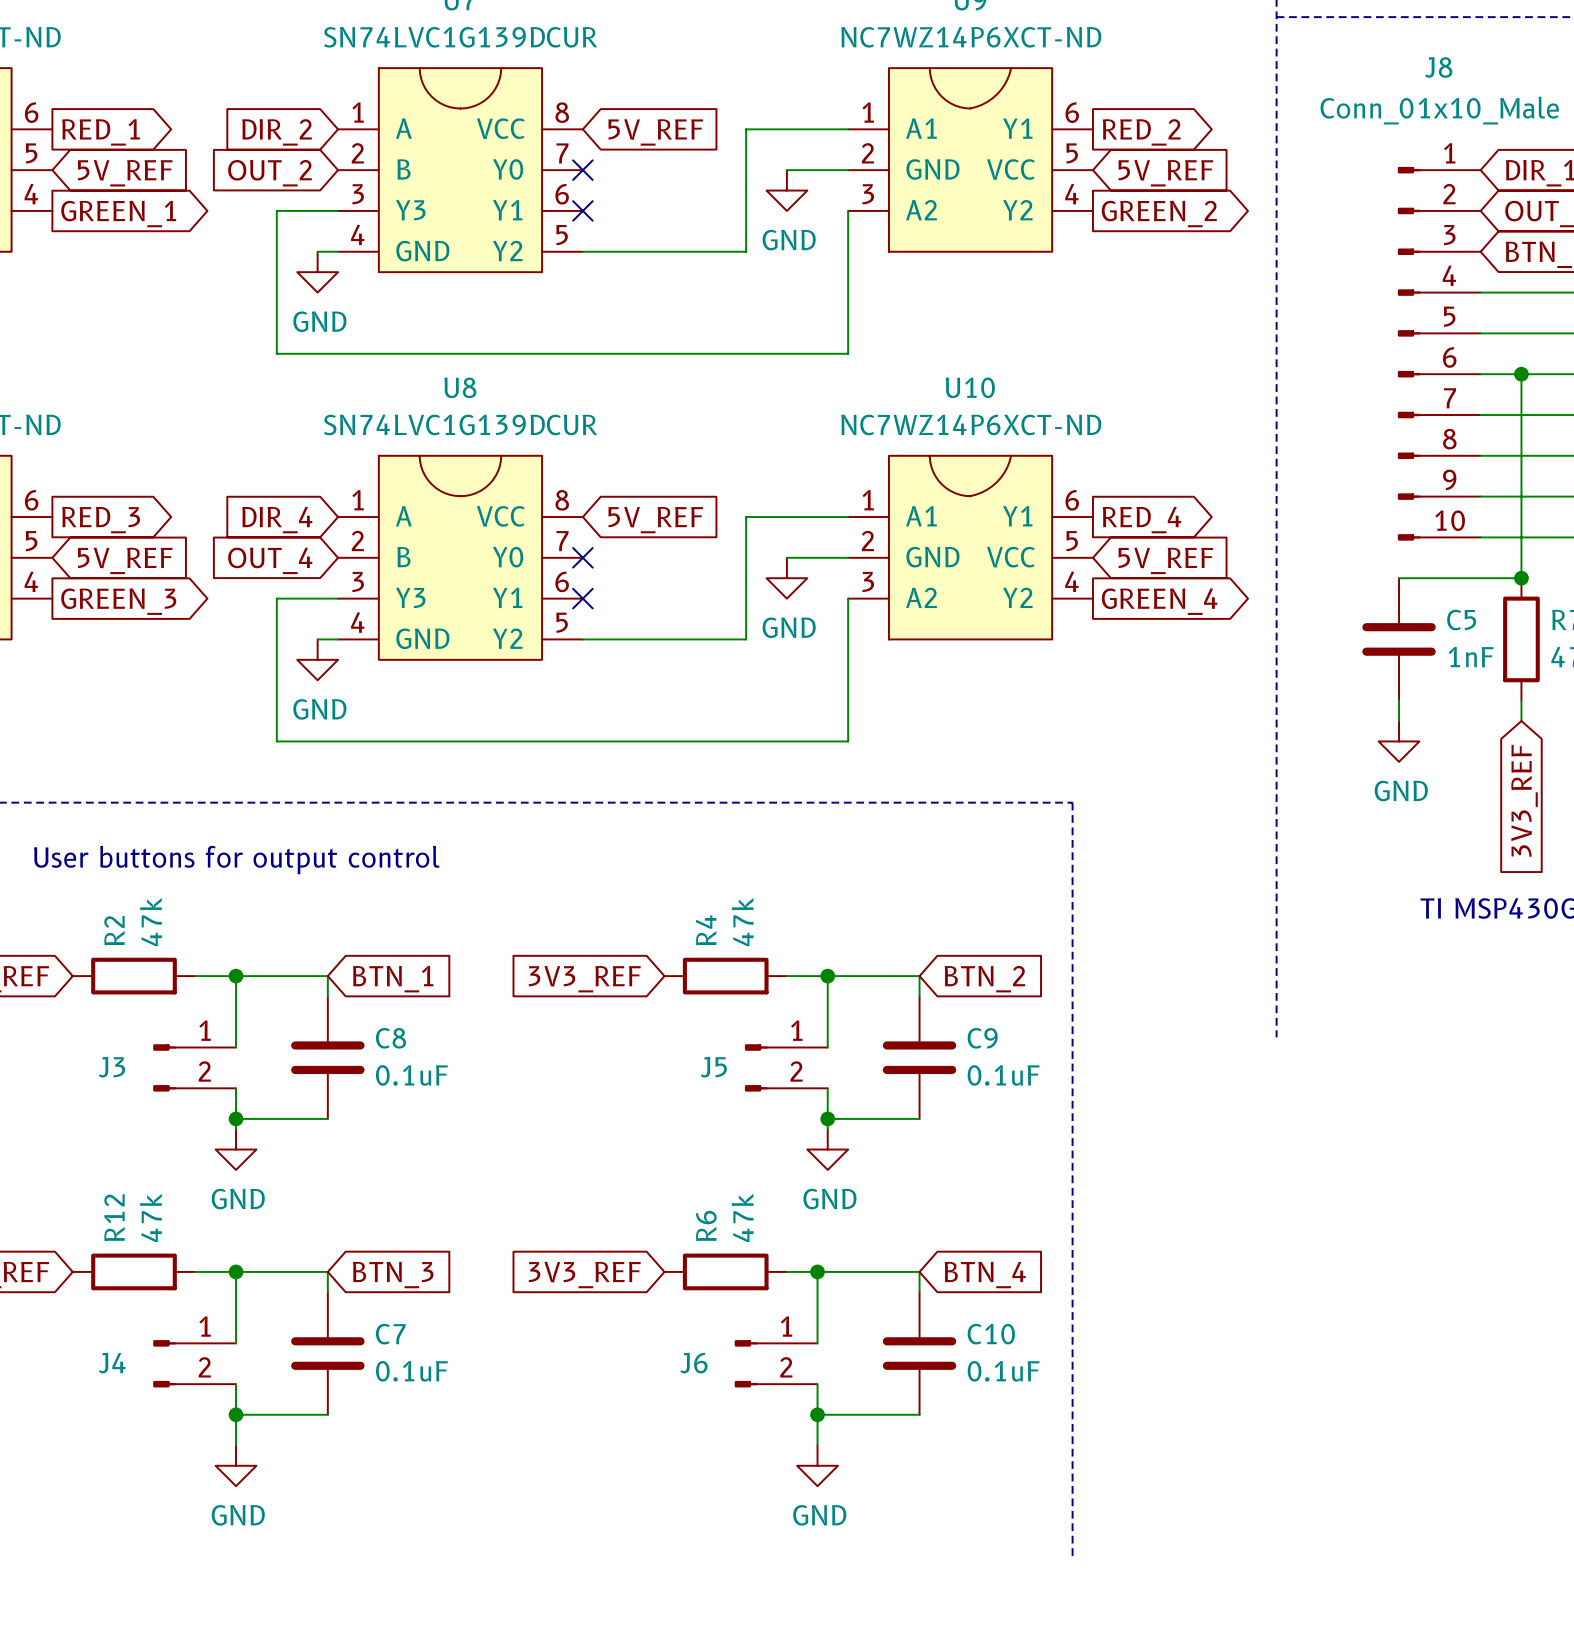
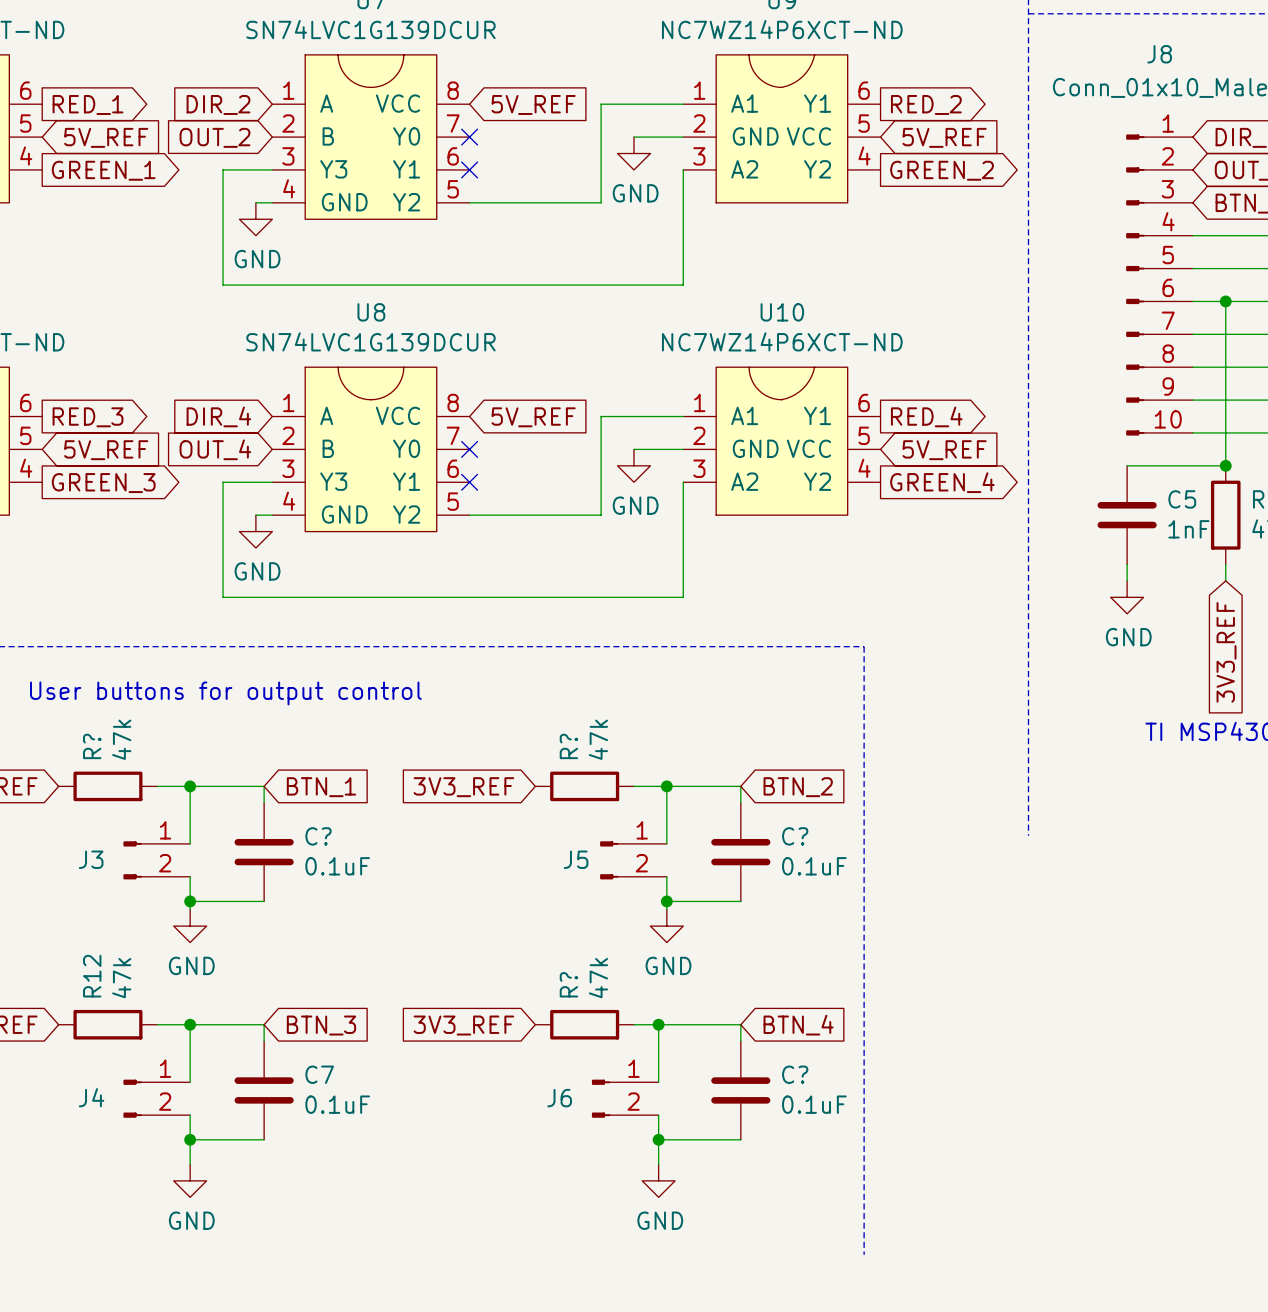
R2 name: R2 (114, 930) -> R? (92, 746)
R4 name: R4 (706, 930) -> R? (568, 746)
C8 name: C8 (391, 1038) -> C? (318, 836)
C9 name: C9 (982, 1038) -> C? (795, 836)
R6 name: R6 (706, 1226) -> R? (568, 984)
C10 name: C10 (991, 1334) -> C? (795, 1074)

